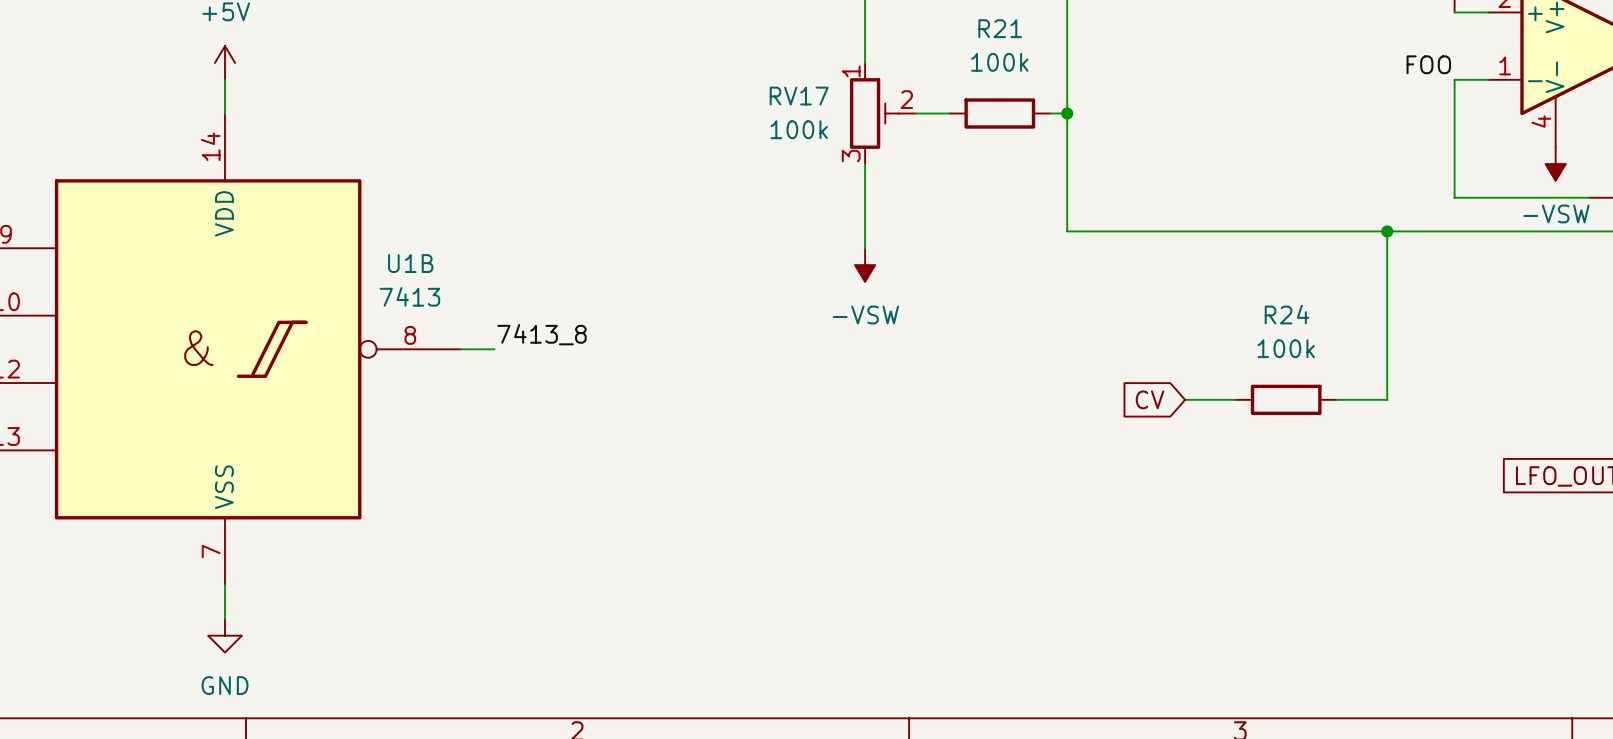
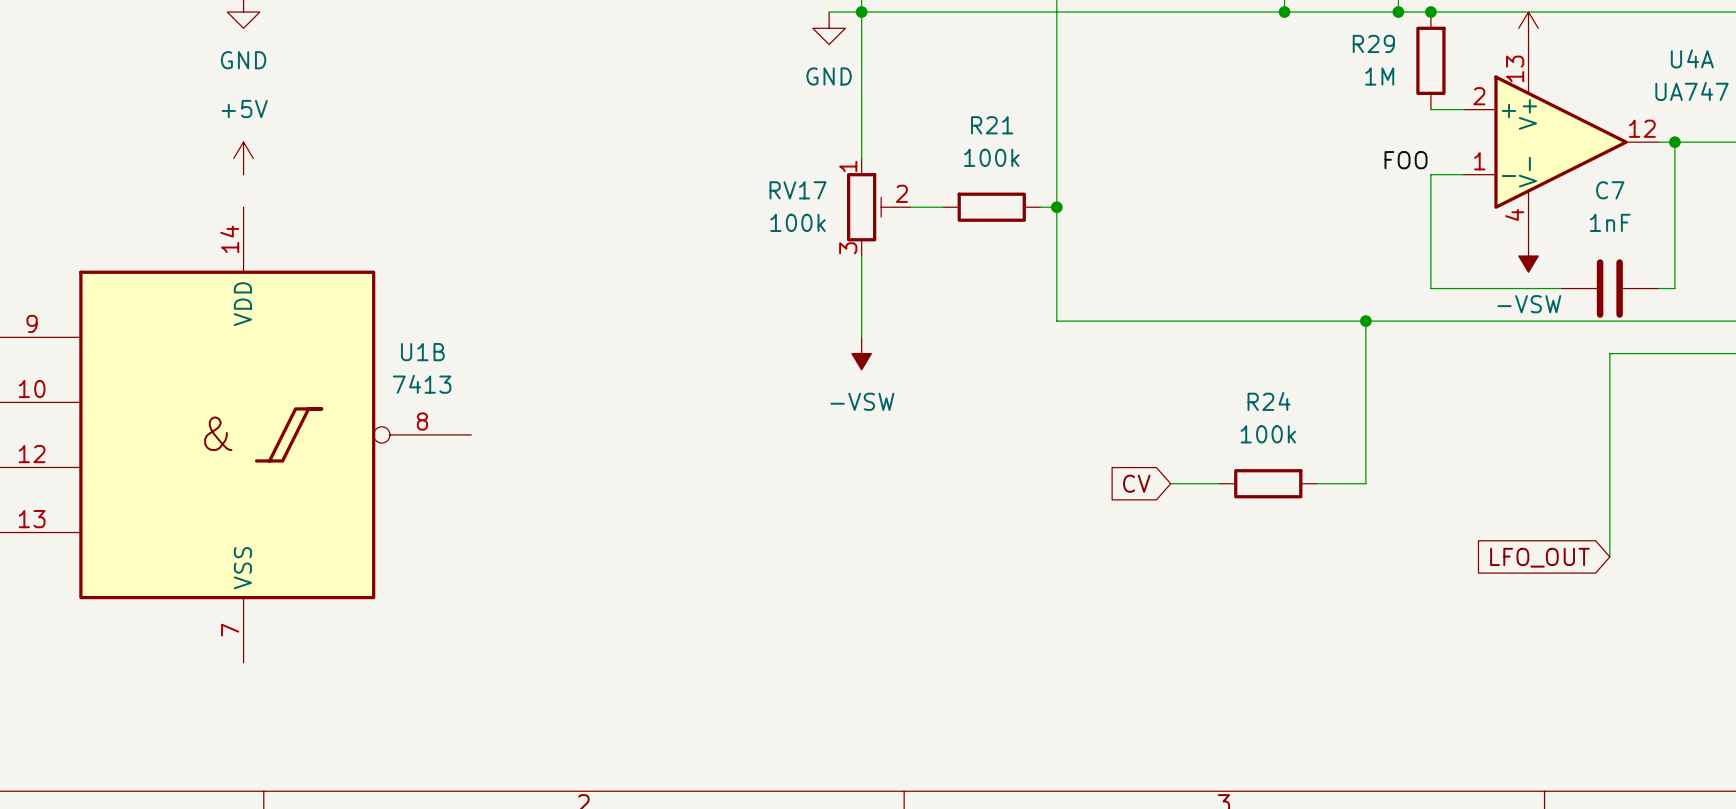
wire: (225, 79) (225, 113) -> none
label: 7413_8 (541, 334) -> none
wire: (460, 349) (494, 349) -> none
wire: (225, 585) (225, 618) -> none
power symbol: GND (225, 635) -> none

